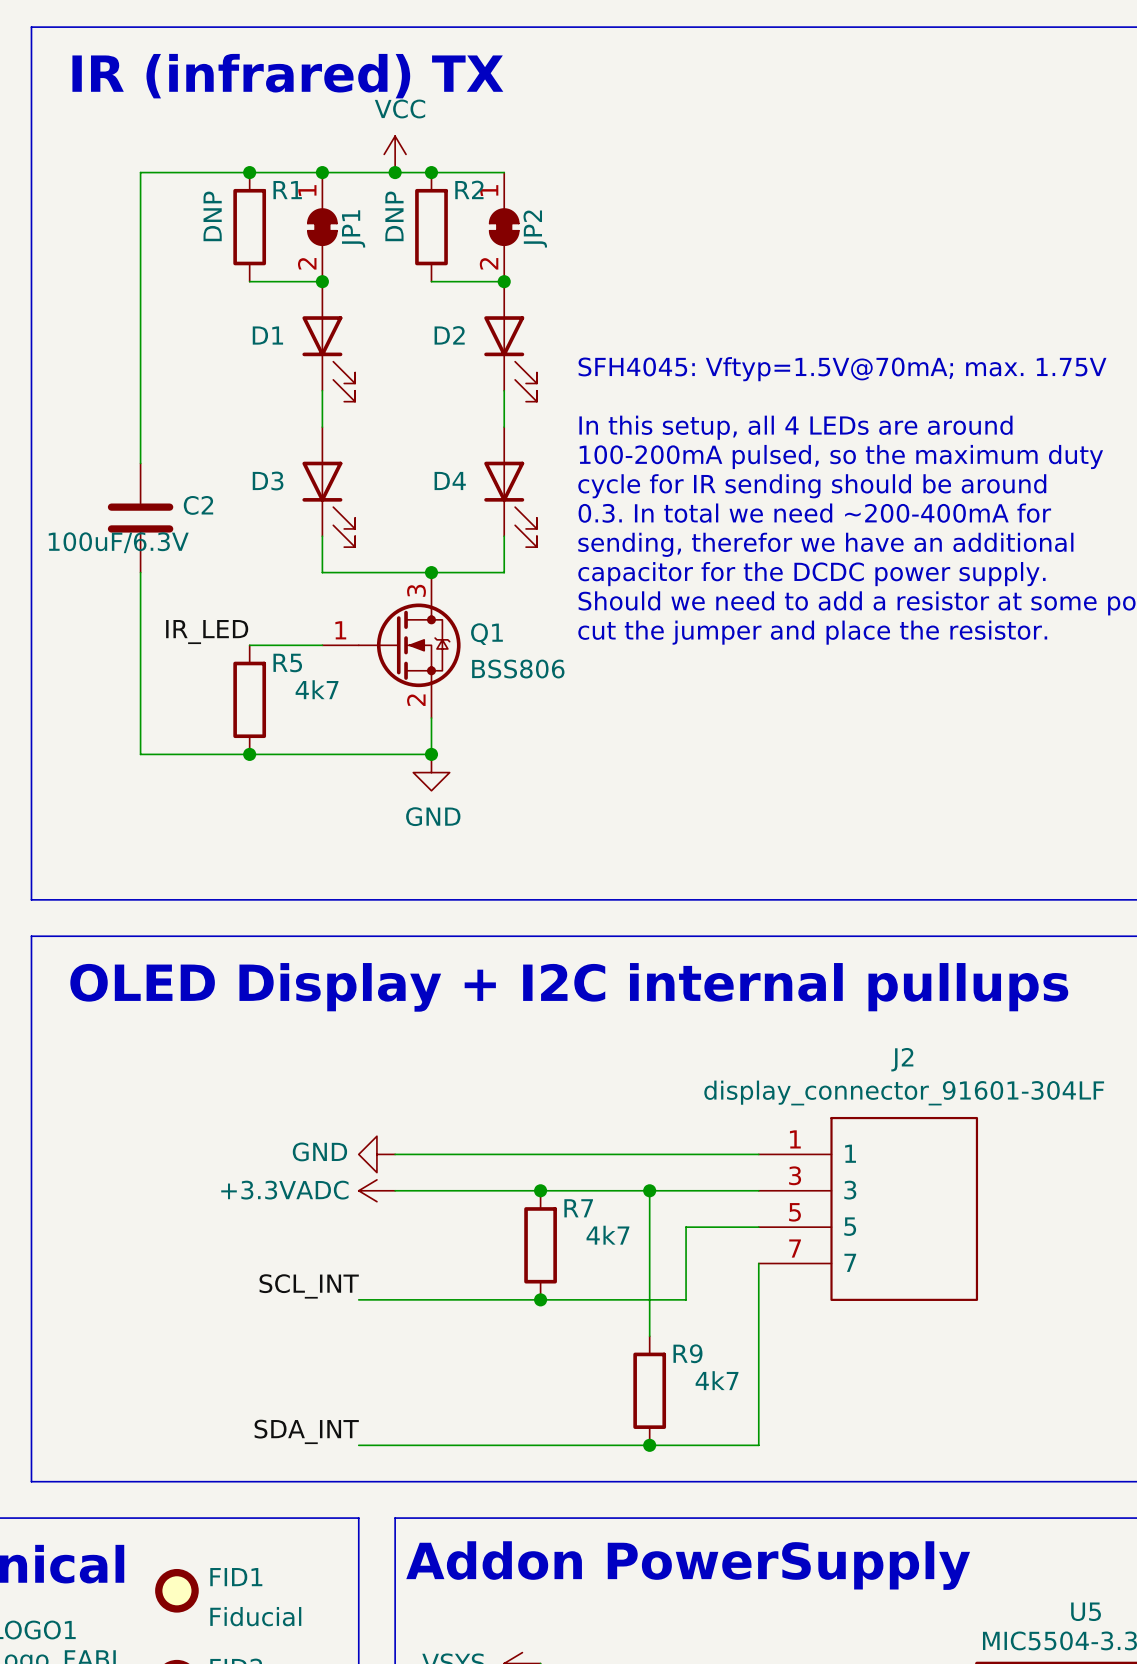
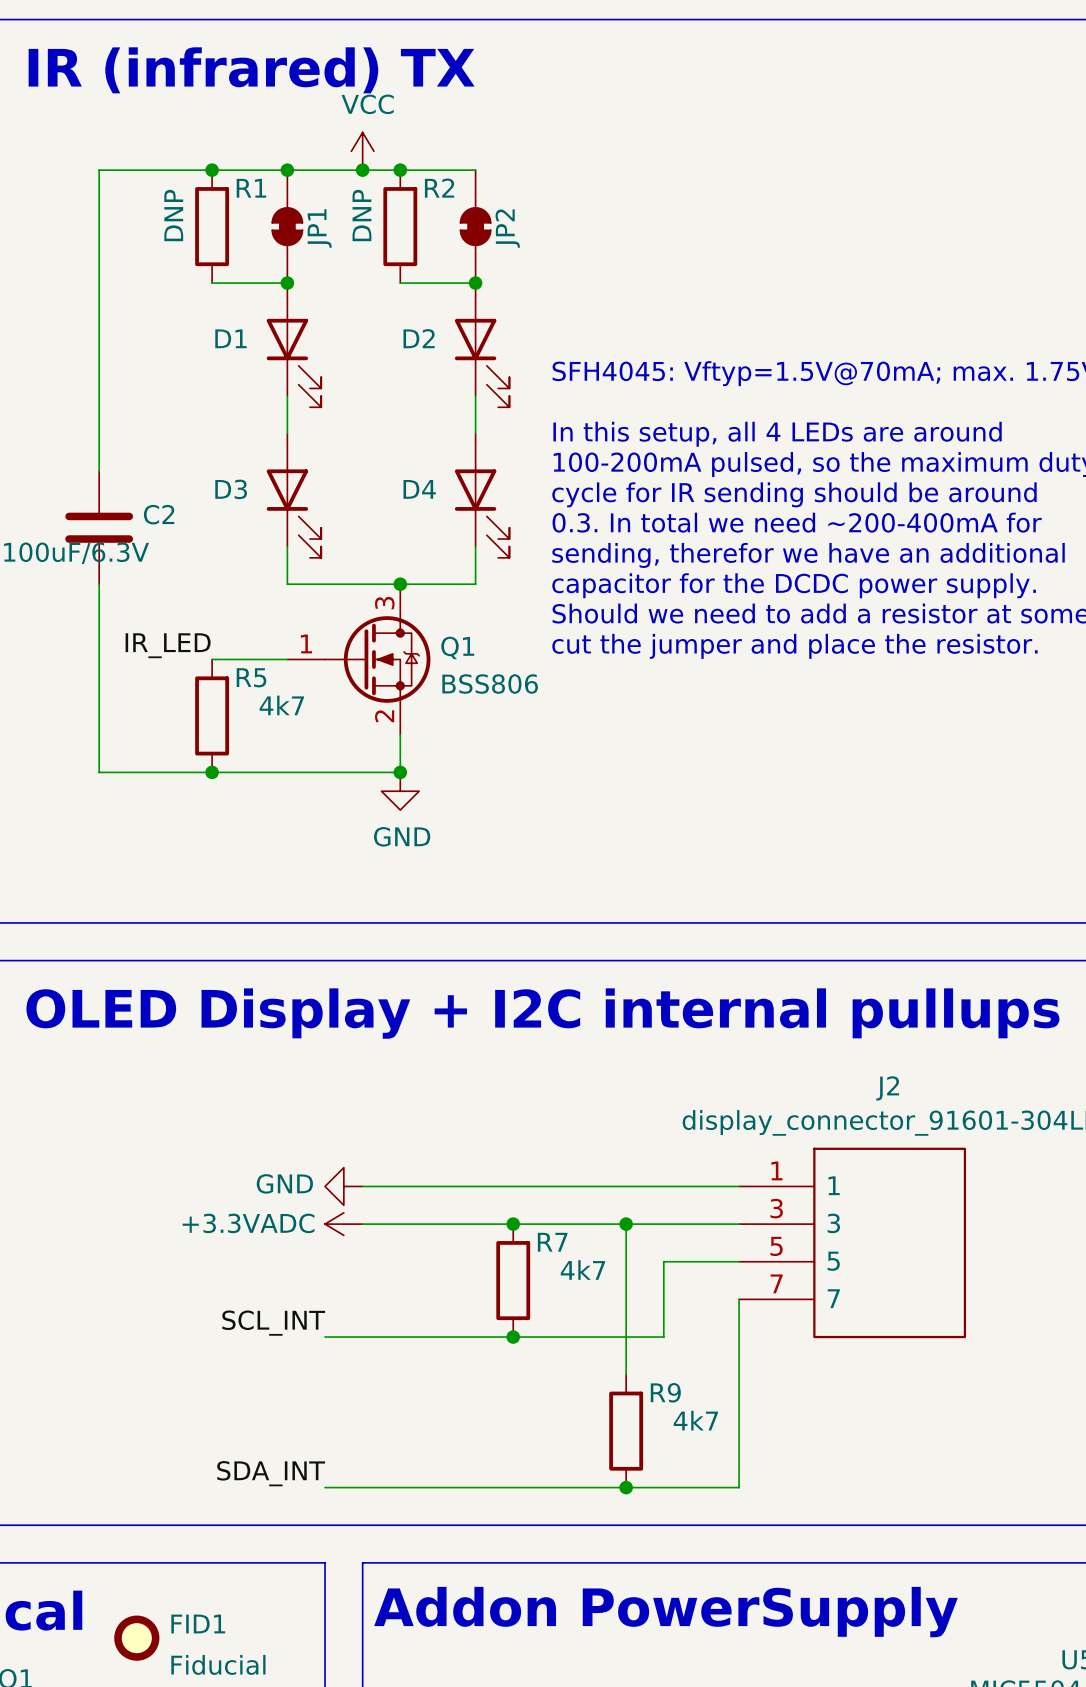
JP1 pin number: 1 (307, 190) -> none
JP2 pin number: 1 (489, 190) -> none
JP1 pin number: 2 (307, 263) -> none
JP2 pin number: 2 (489, 263) -> none

